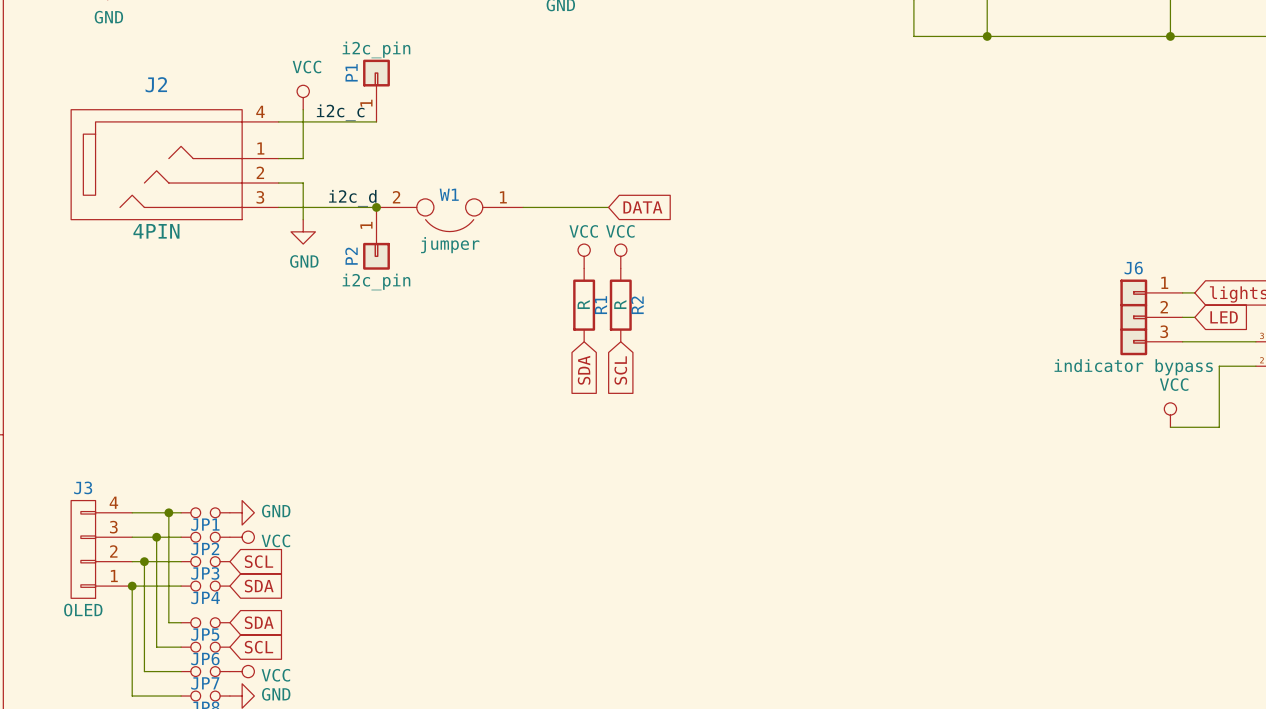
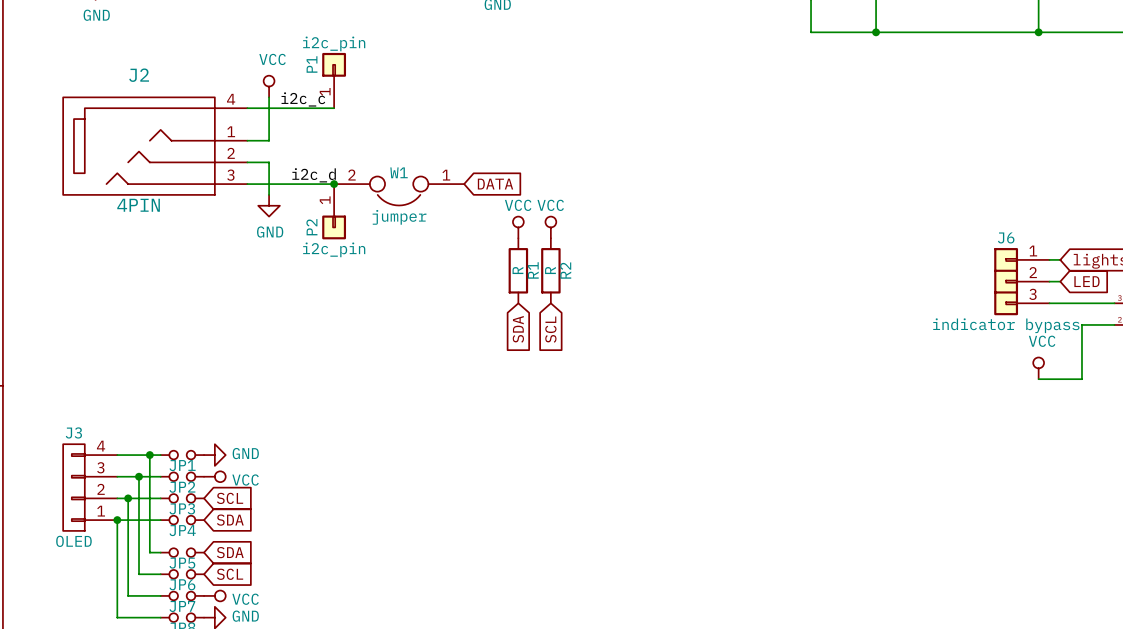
wire: (523, 207) (608, 207) -> none
global label position: DATA (642, 207) -> DATA (495, 184)

